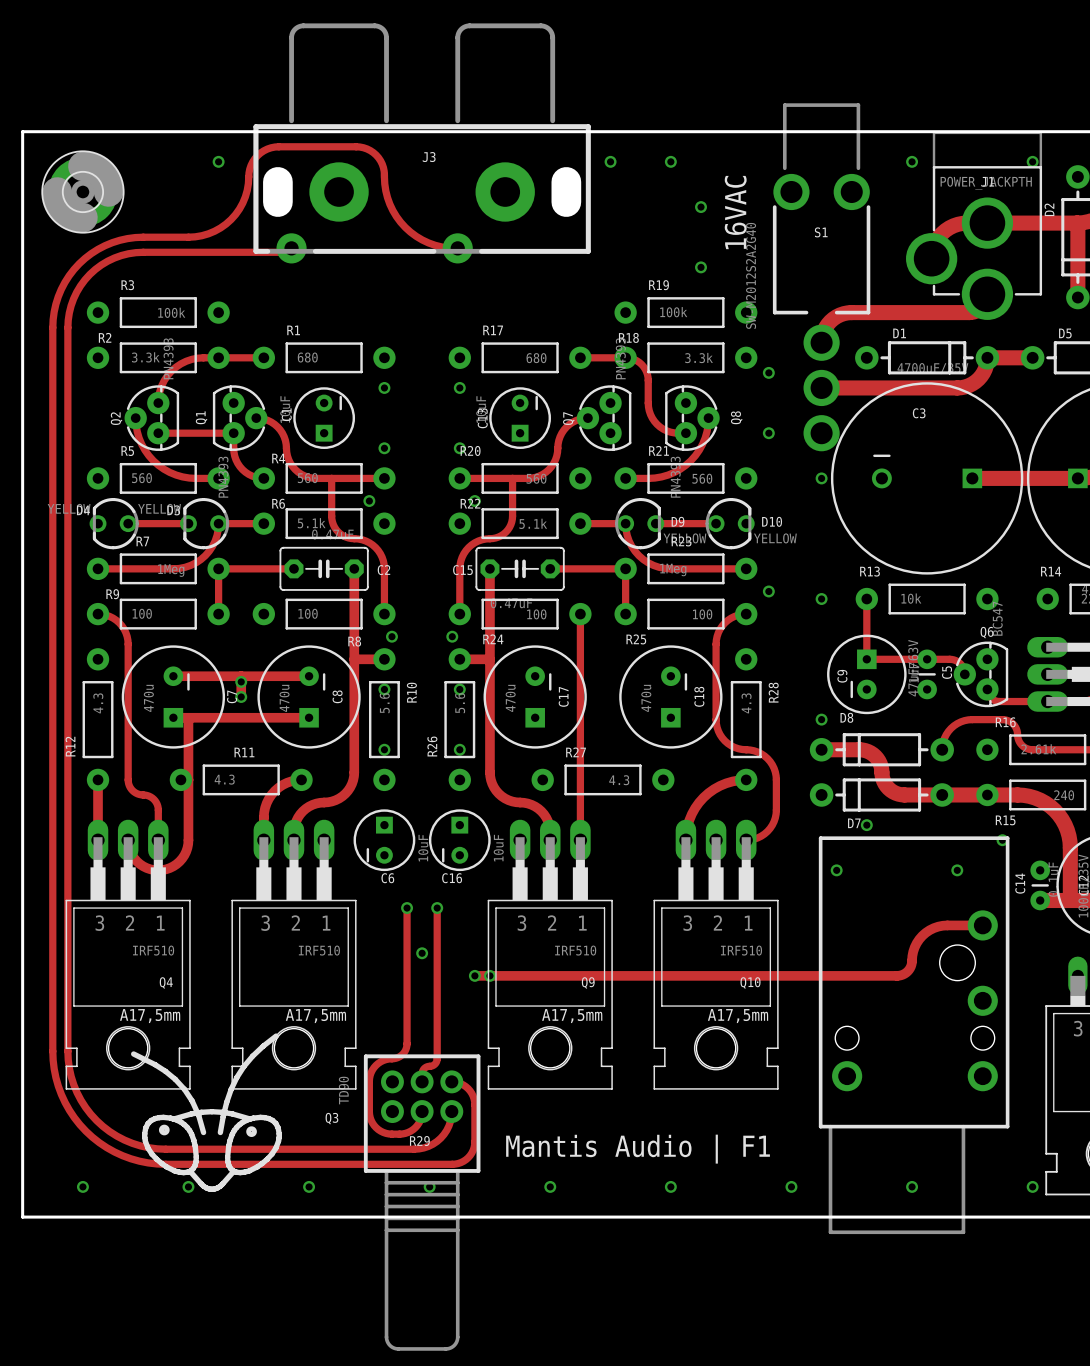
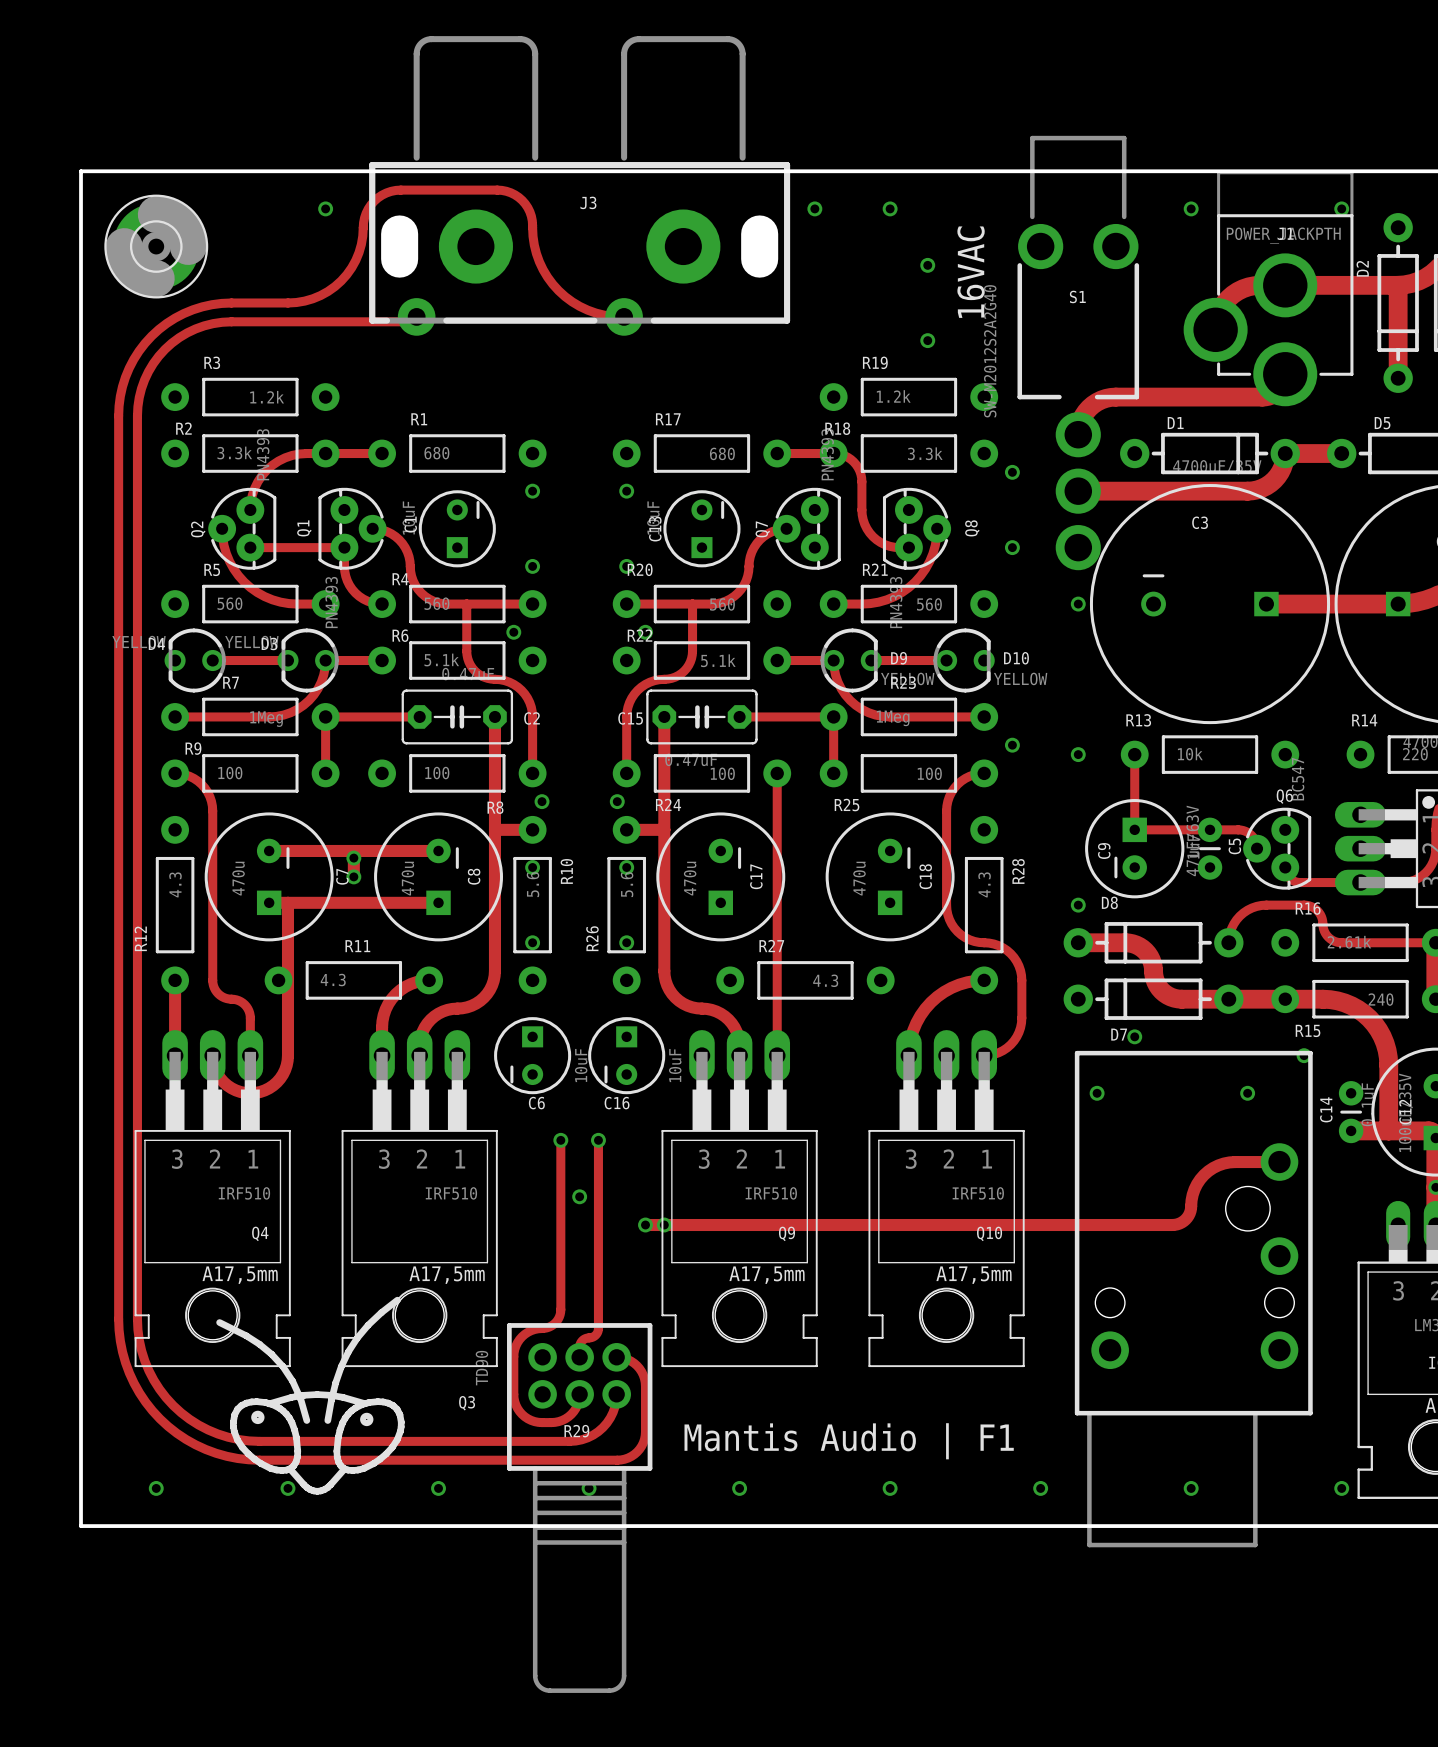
R3 value: 100k (171, 312) -> 1.2k (267, 397)
R19 value: 100k (673, 312) -> 1.2k (893, 396)

